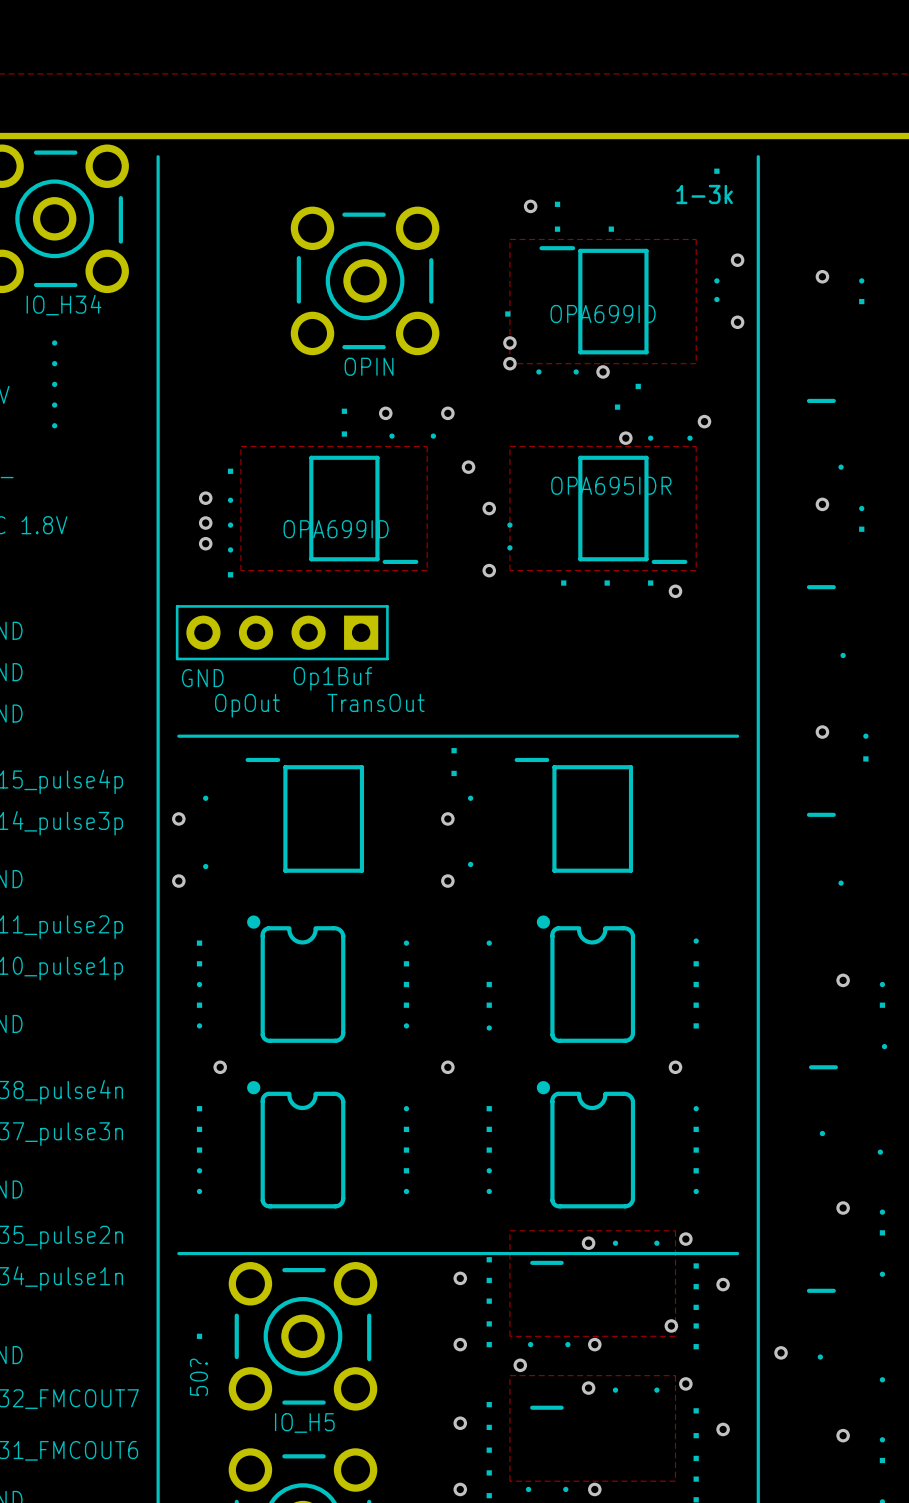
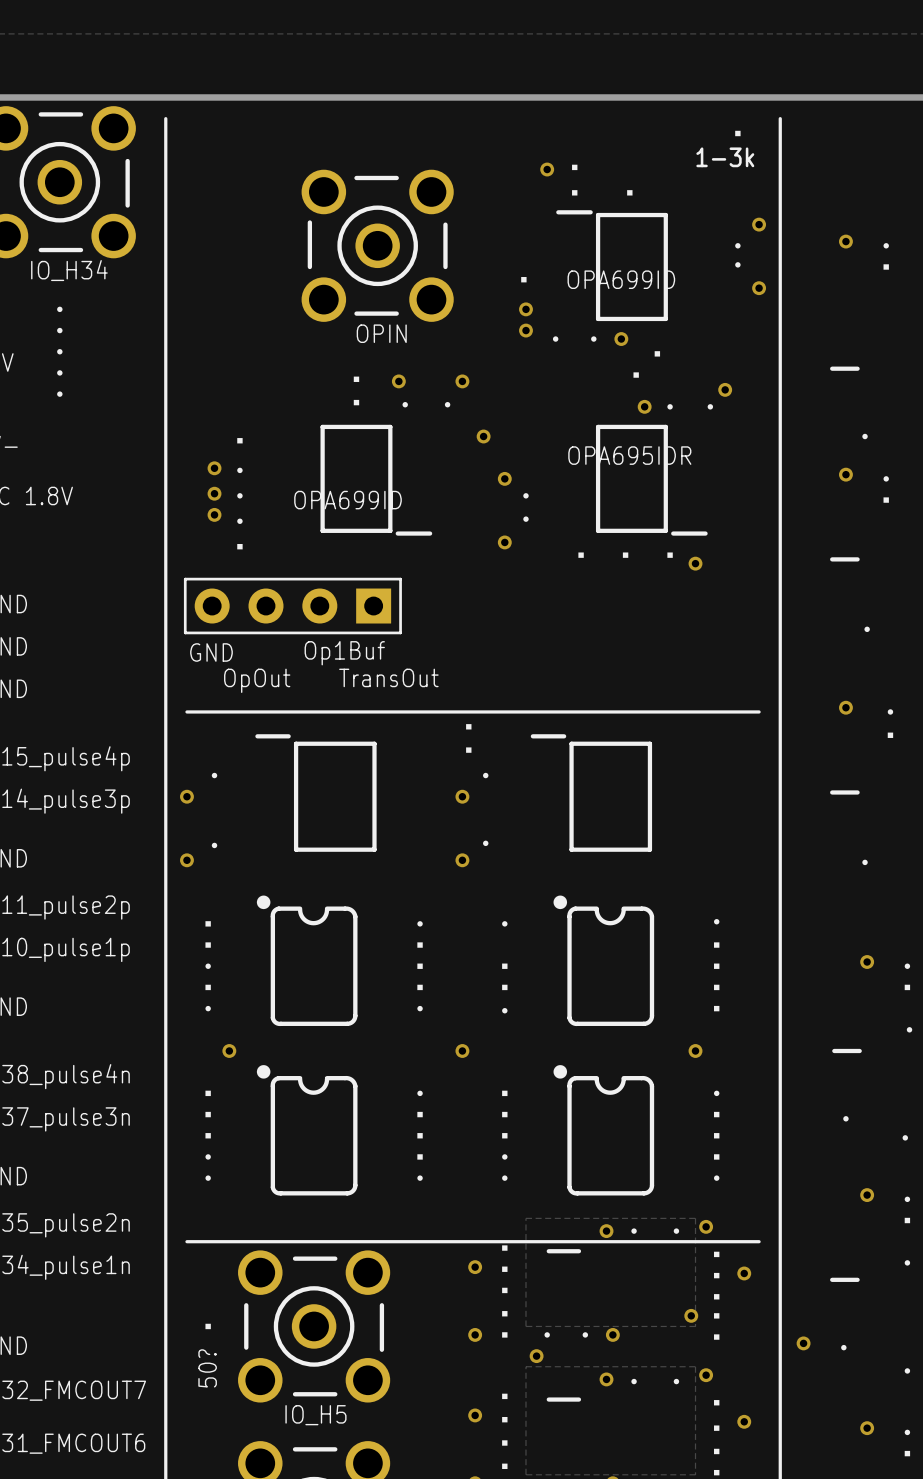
zone outline: (509, 239) (696, 239) (696, 363) (509, 363) (509, 239) -> none
zone outline: (240, 446) (427, 446) (427, 570) (240, 570) (240, 446) -> none
zone outline: (509, 446) (509, 570) (696, 570) (696, 446) (509, 446) -> none

